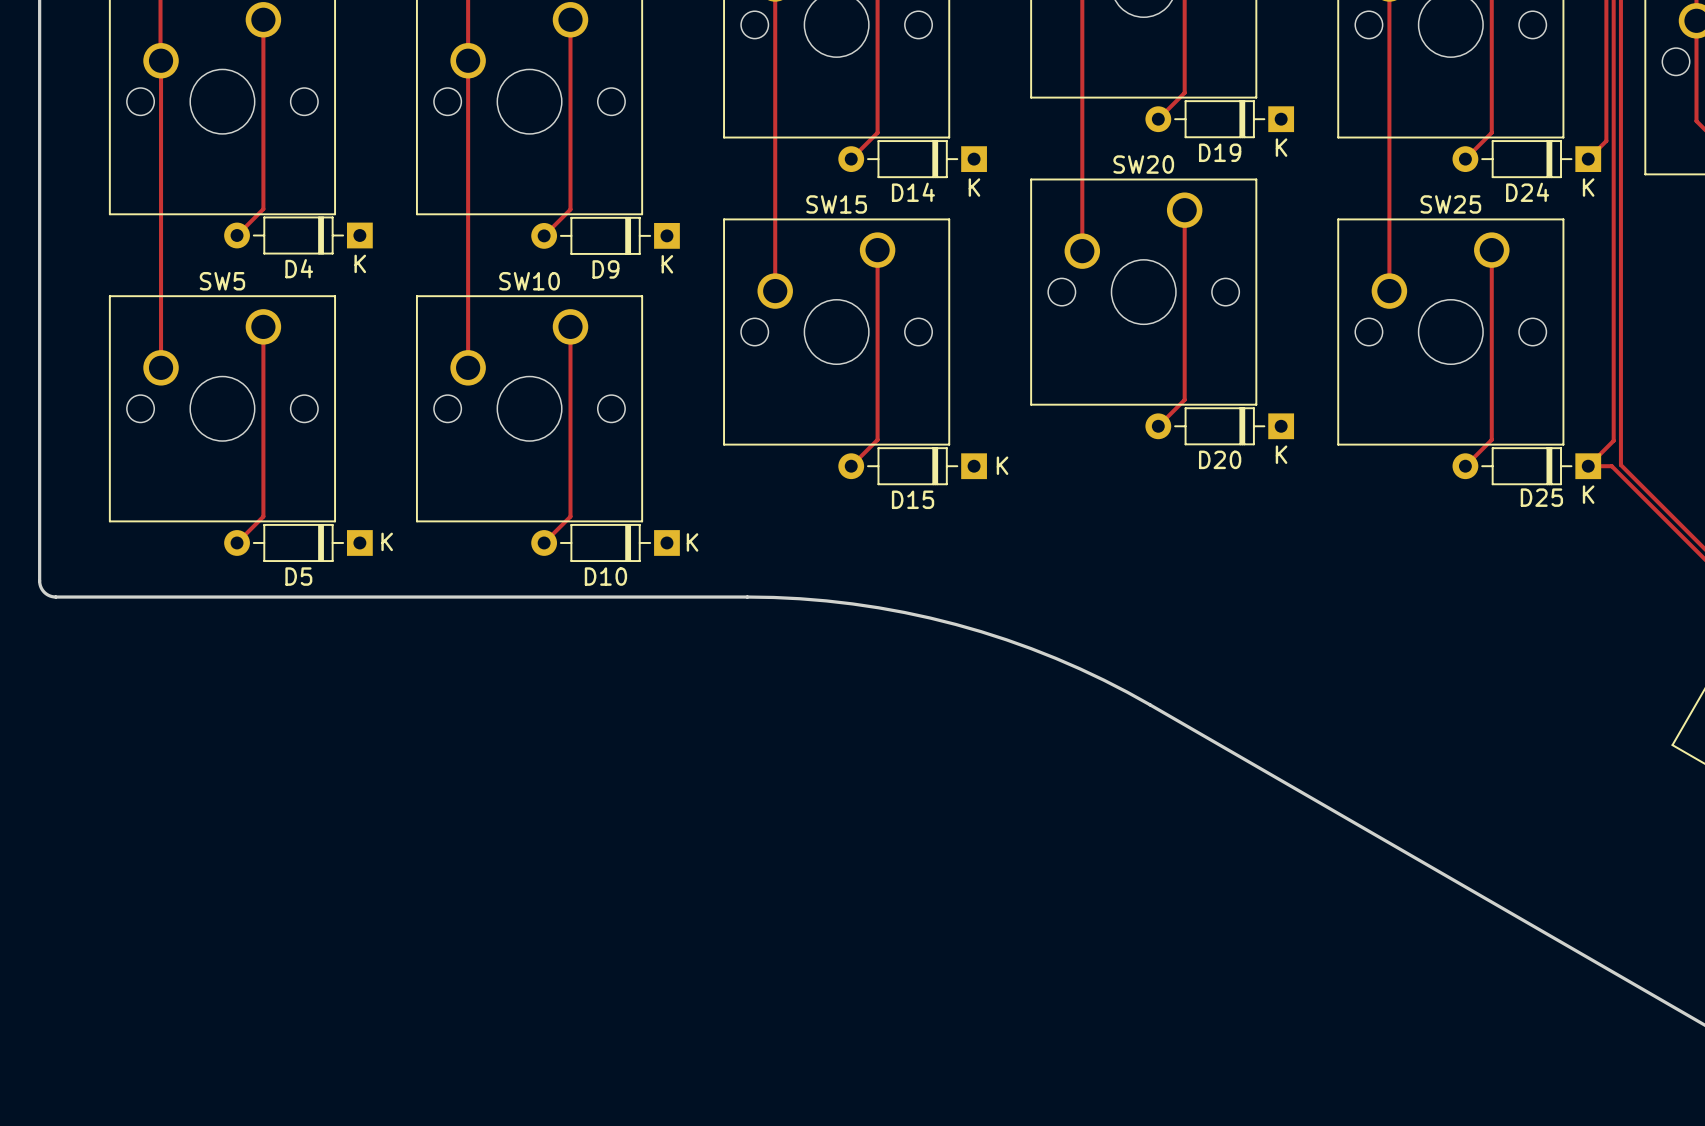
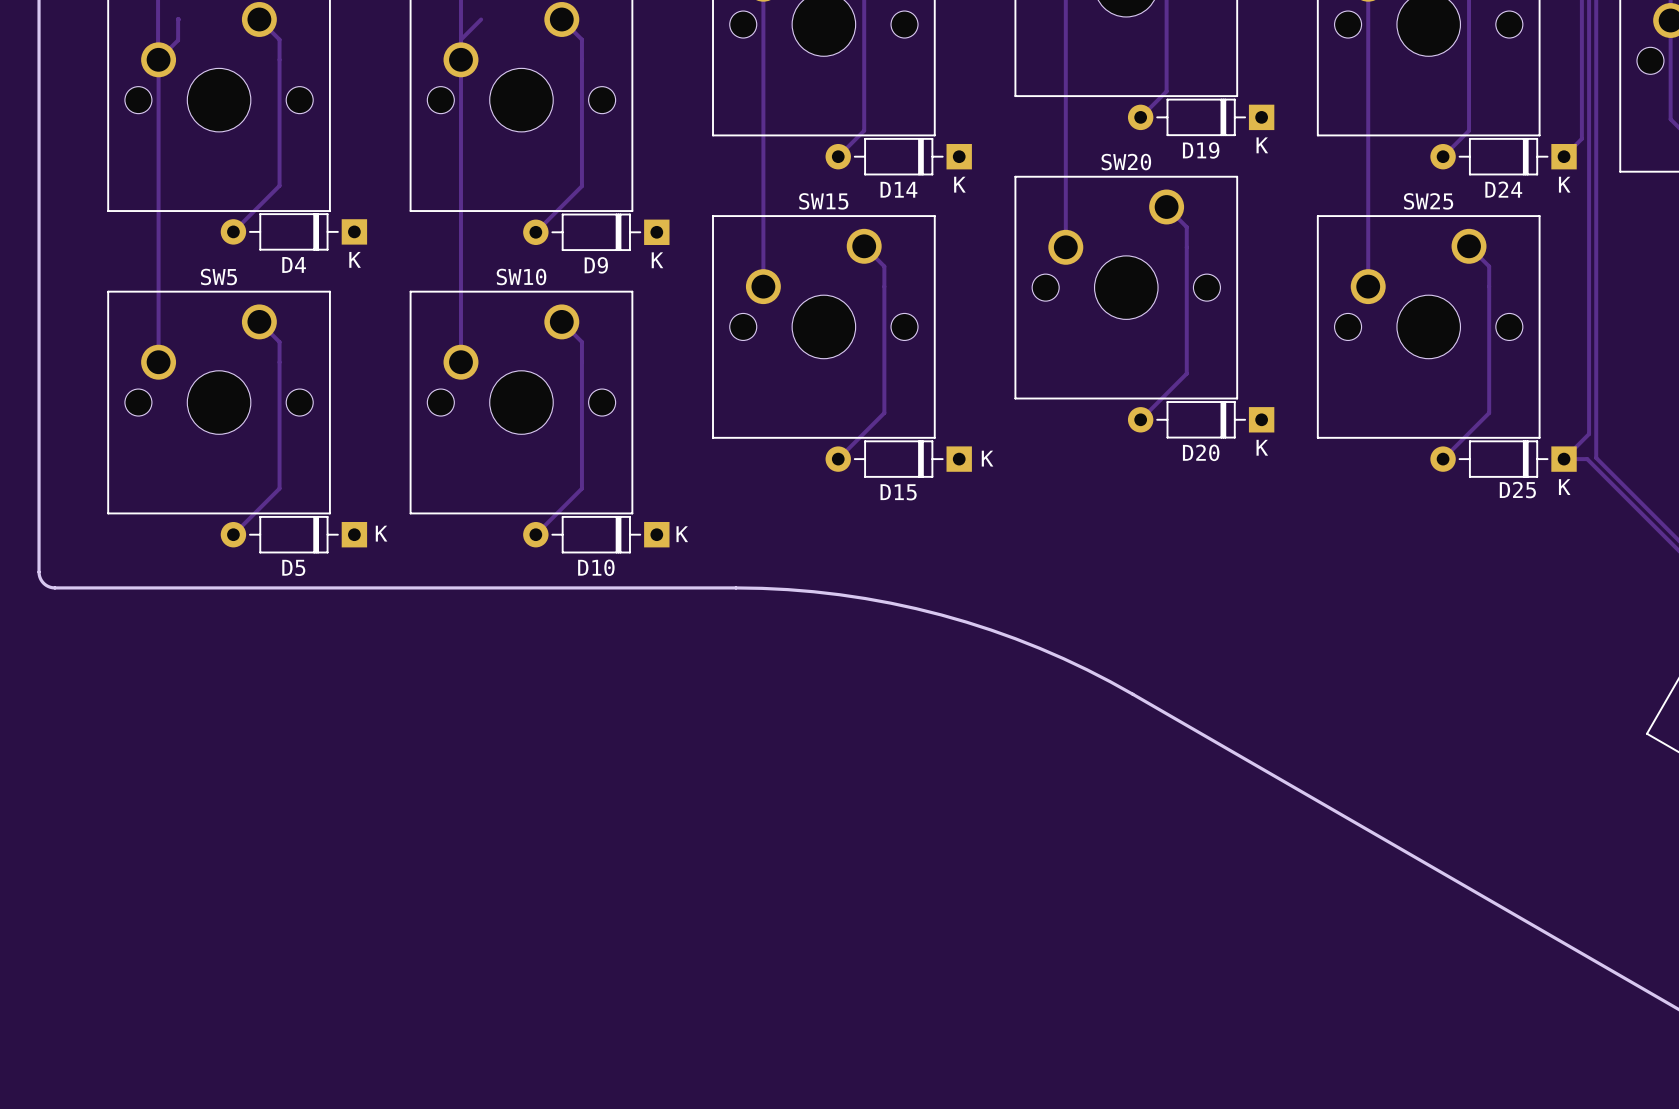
track: none -> (178, 19) (178, 40) (158, 59)
track: (263, 19) (263, 209) -> (259, 19) (279, 39) (279, 185) (259, 205)
track: none -> (481, 19) (460, 39)
track: (570, 19) (570, 209) -> (561, 19) (581, 39) (581, 186) (561, 206)
track: (1184, 210) (1184, 399) -> (1166, 206) (1186, 227) (1186, 373) (1166, 393)
track: (877, 250) (877, 439) -> (864, 246) (884, 266) (884, 412) (864, 433)
track: (1491, 250) (1491, 439) -> (1469, 246) (1489, 266) (1489, 412) (1469, 433)
track: (263, 326) (263, 516) -> (259, 321) (279, 342) (279, 488) (259, 508)
track: (570, 326) (570, 516) -> (561, 321) (581, 342) (581, 488) (561, 508)

